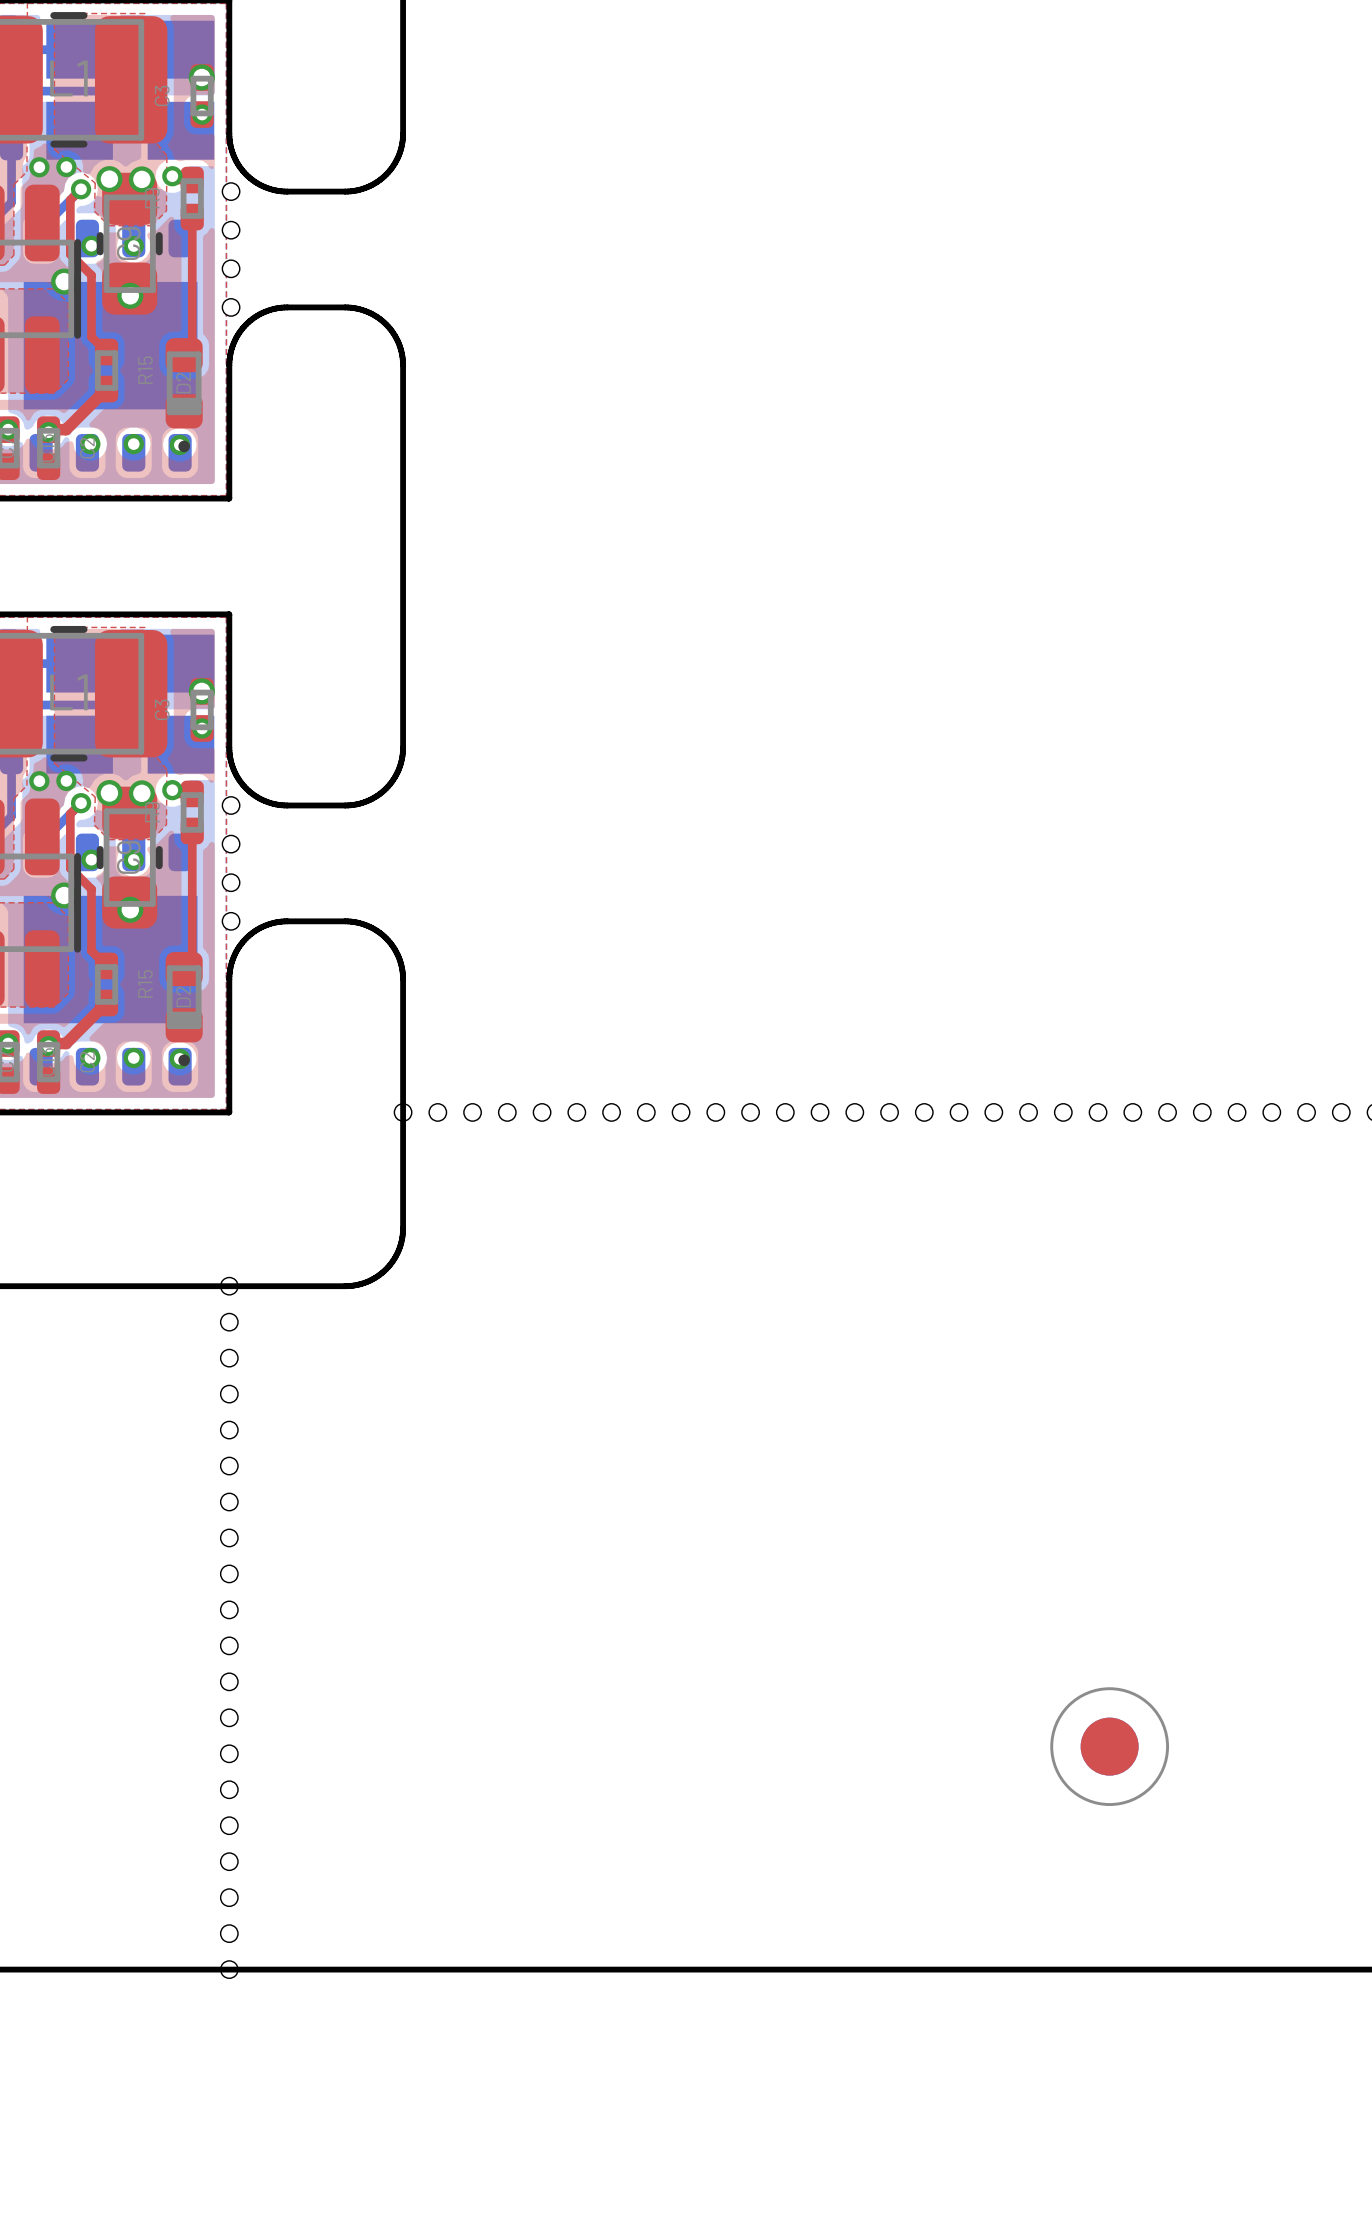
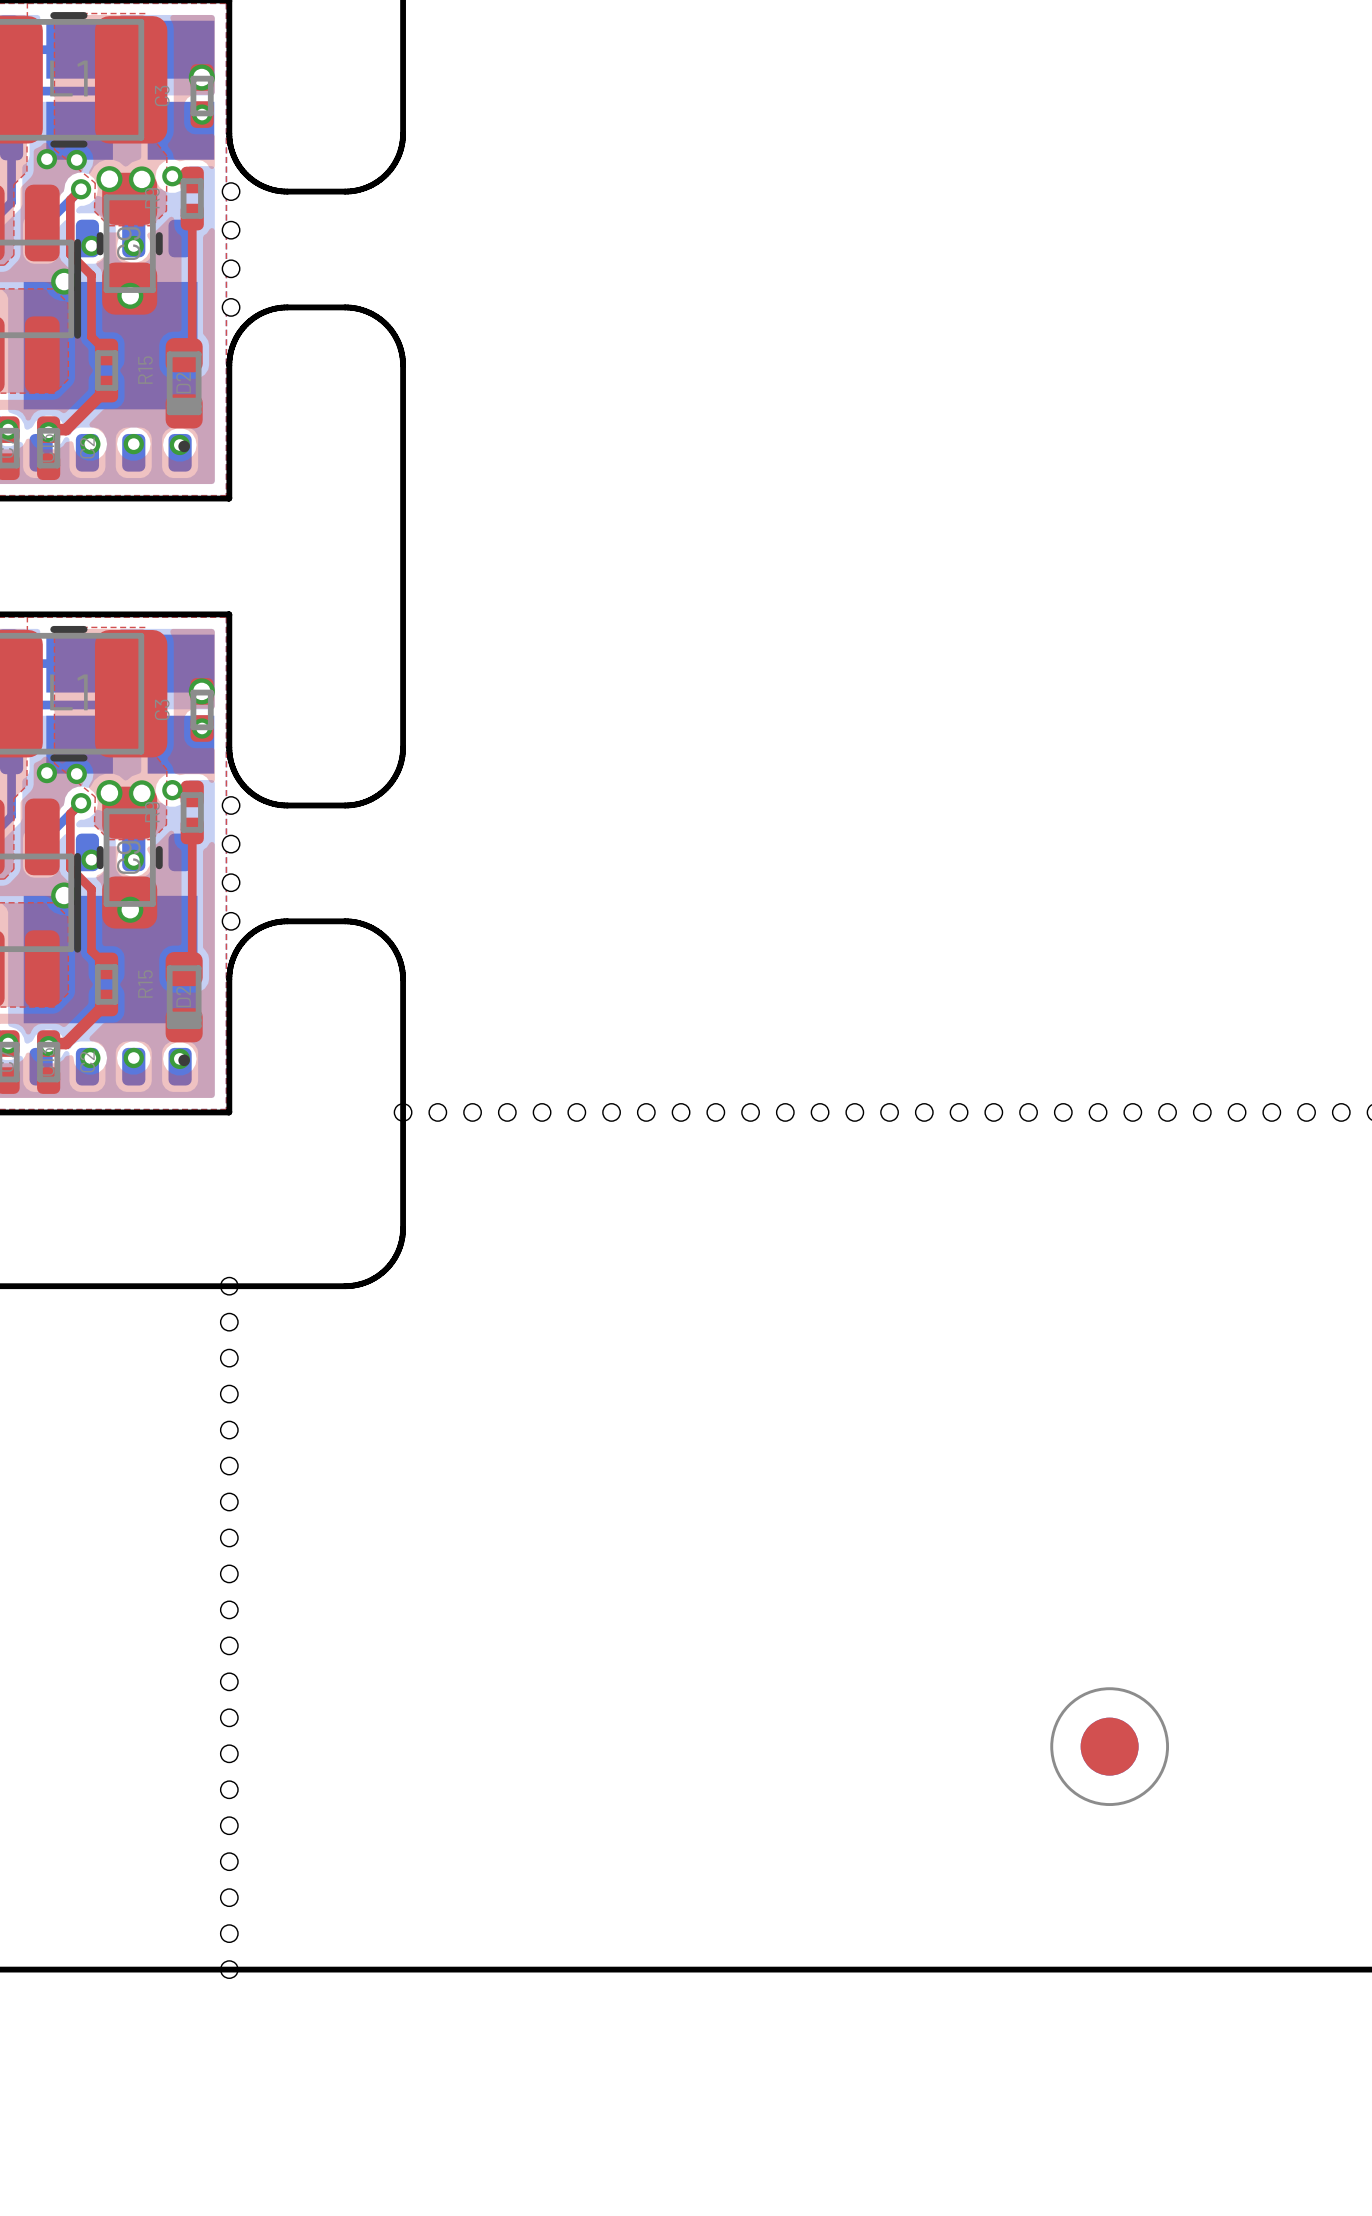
via: none -> (46, 159)
via: none -> (76, 160)
via: (39, 167) -> none
via: (66, 167) -> none
via: none -> (46, 773)
via: none -> (76, 773)
via: (66, 780) -> none
via: (39, 781) -> none

